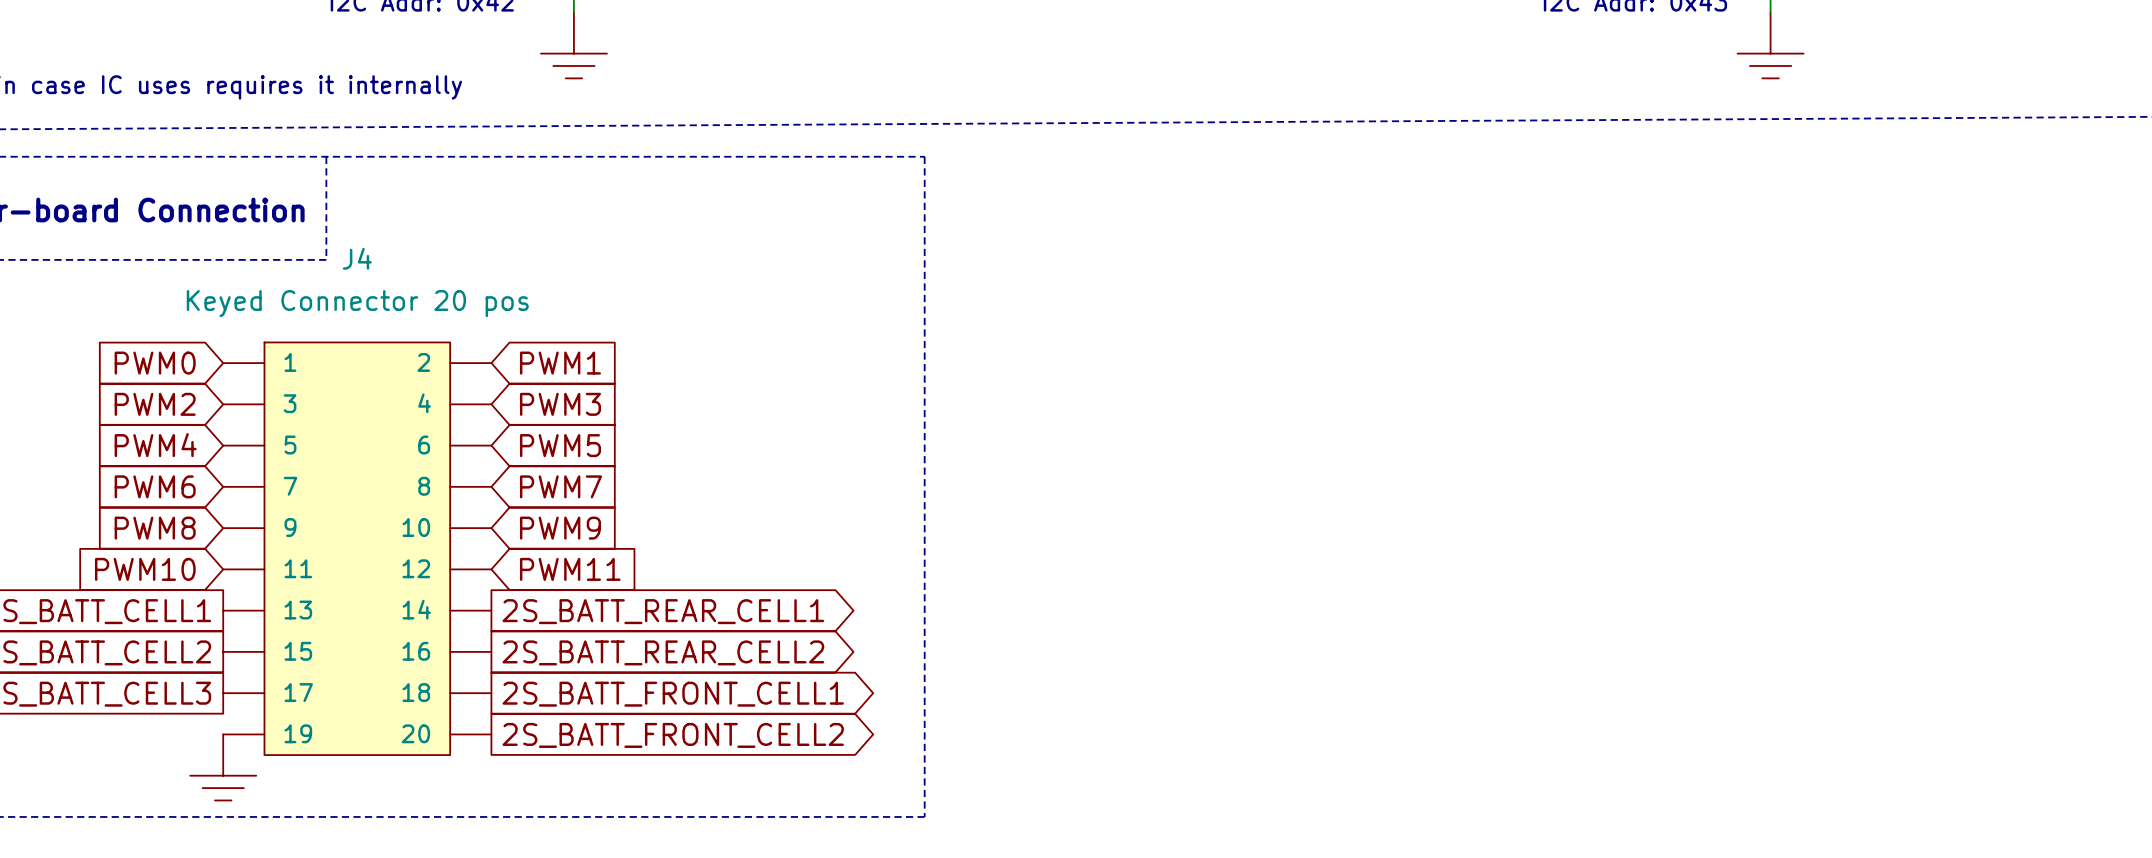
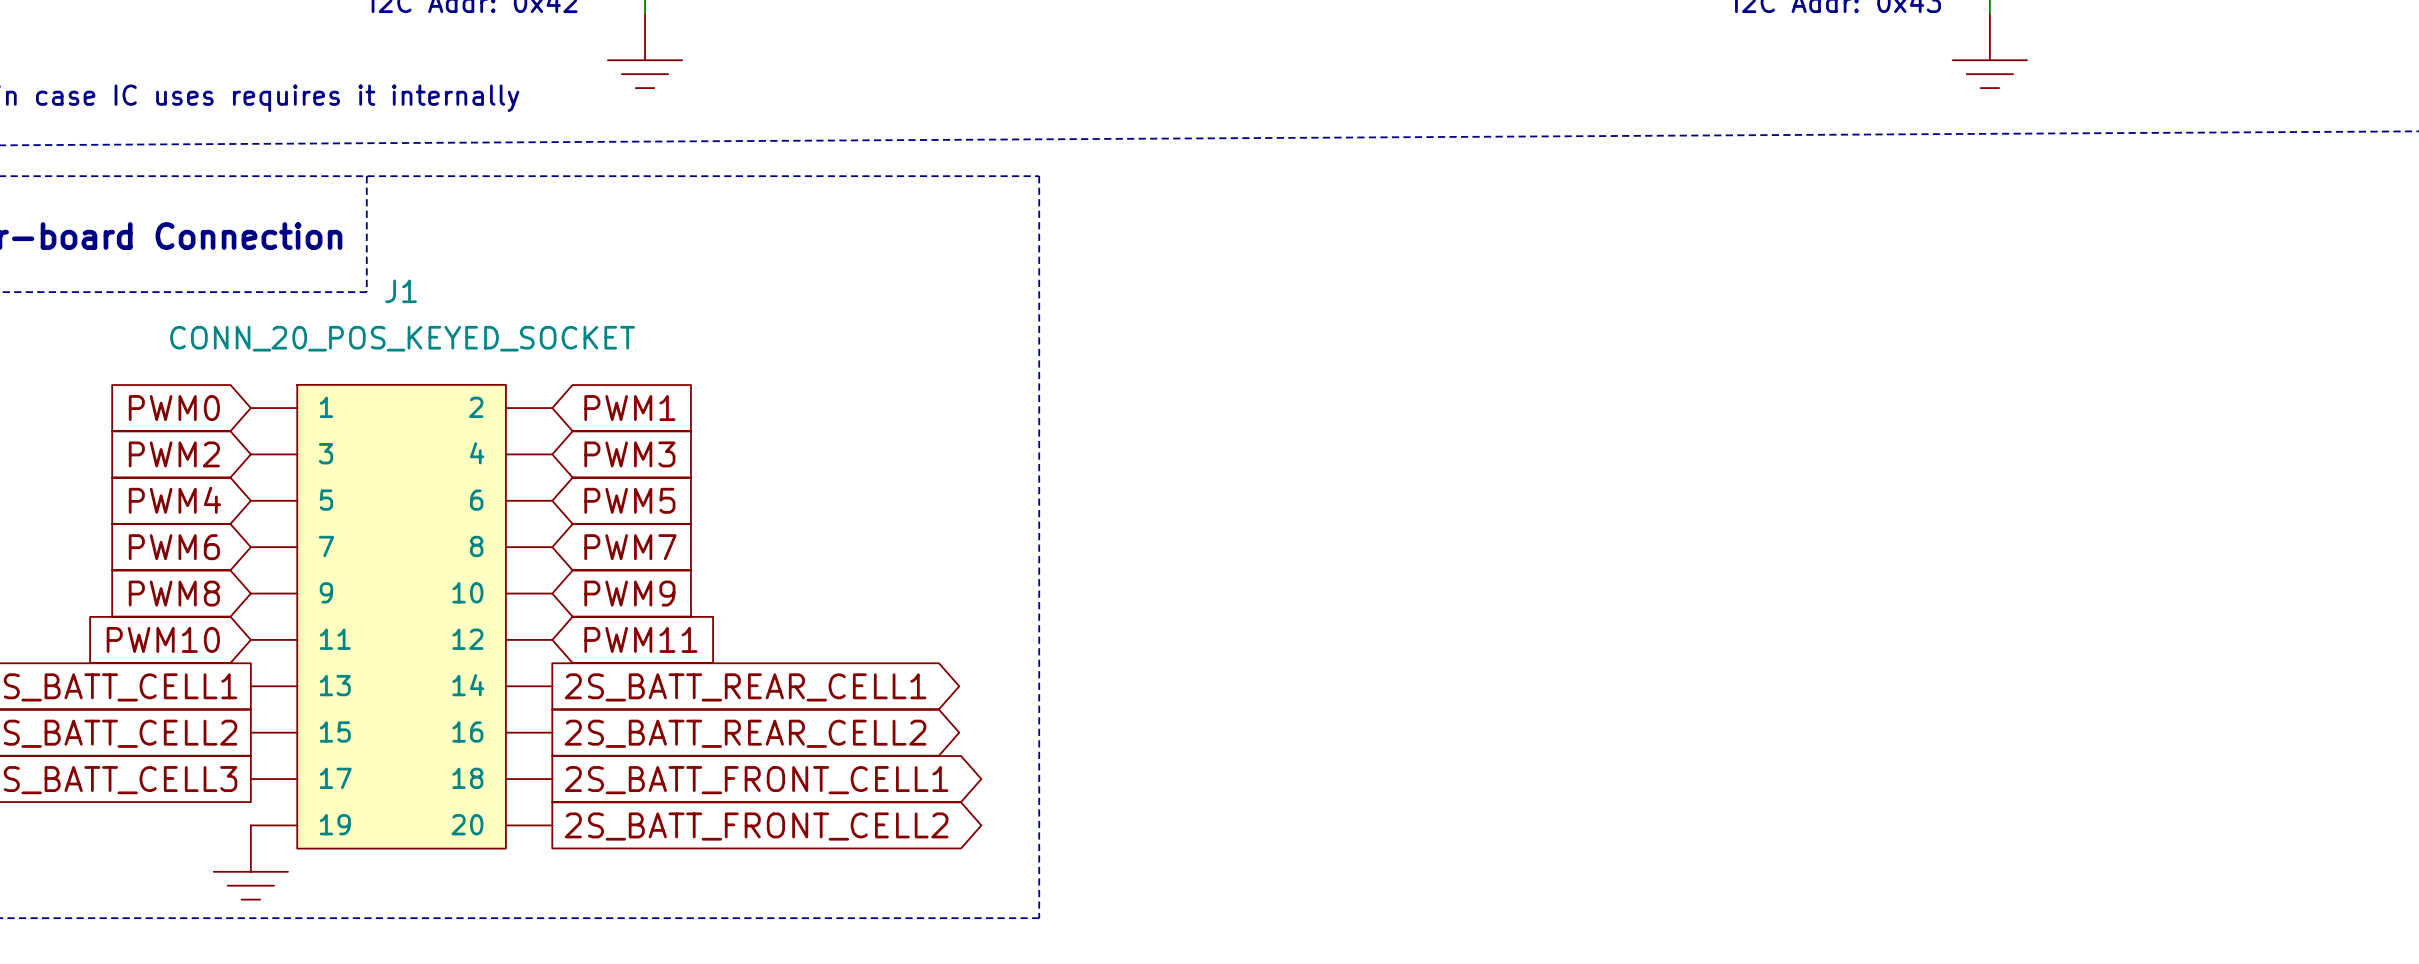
J4 name: J4 (357, 258) -> J1 (401, 291)
J4 value: Keyed Connector 20 pos (357, 303) -> CONN_20_POS_KEYED_SOCKET (402, 338)

